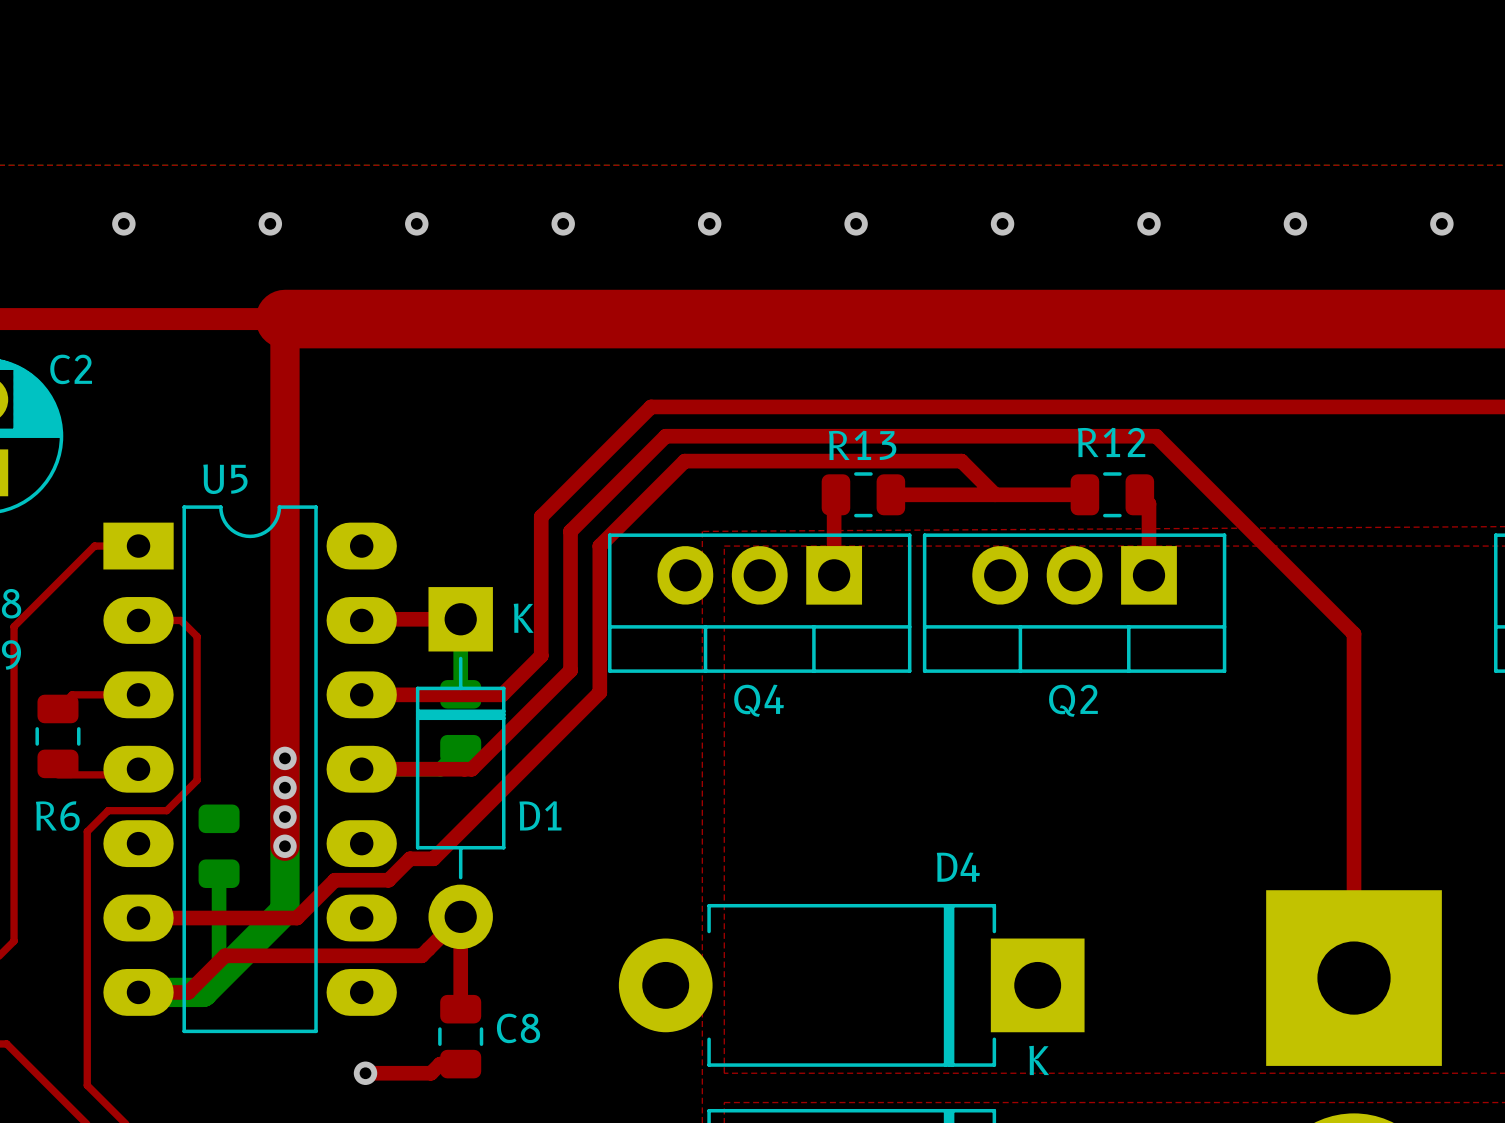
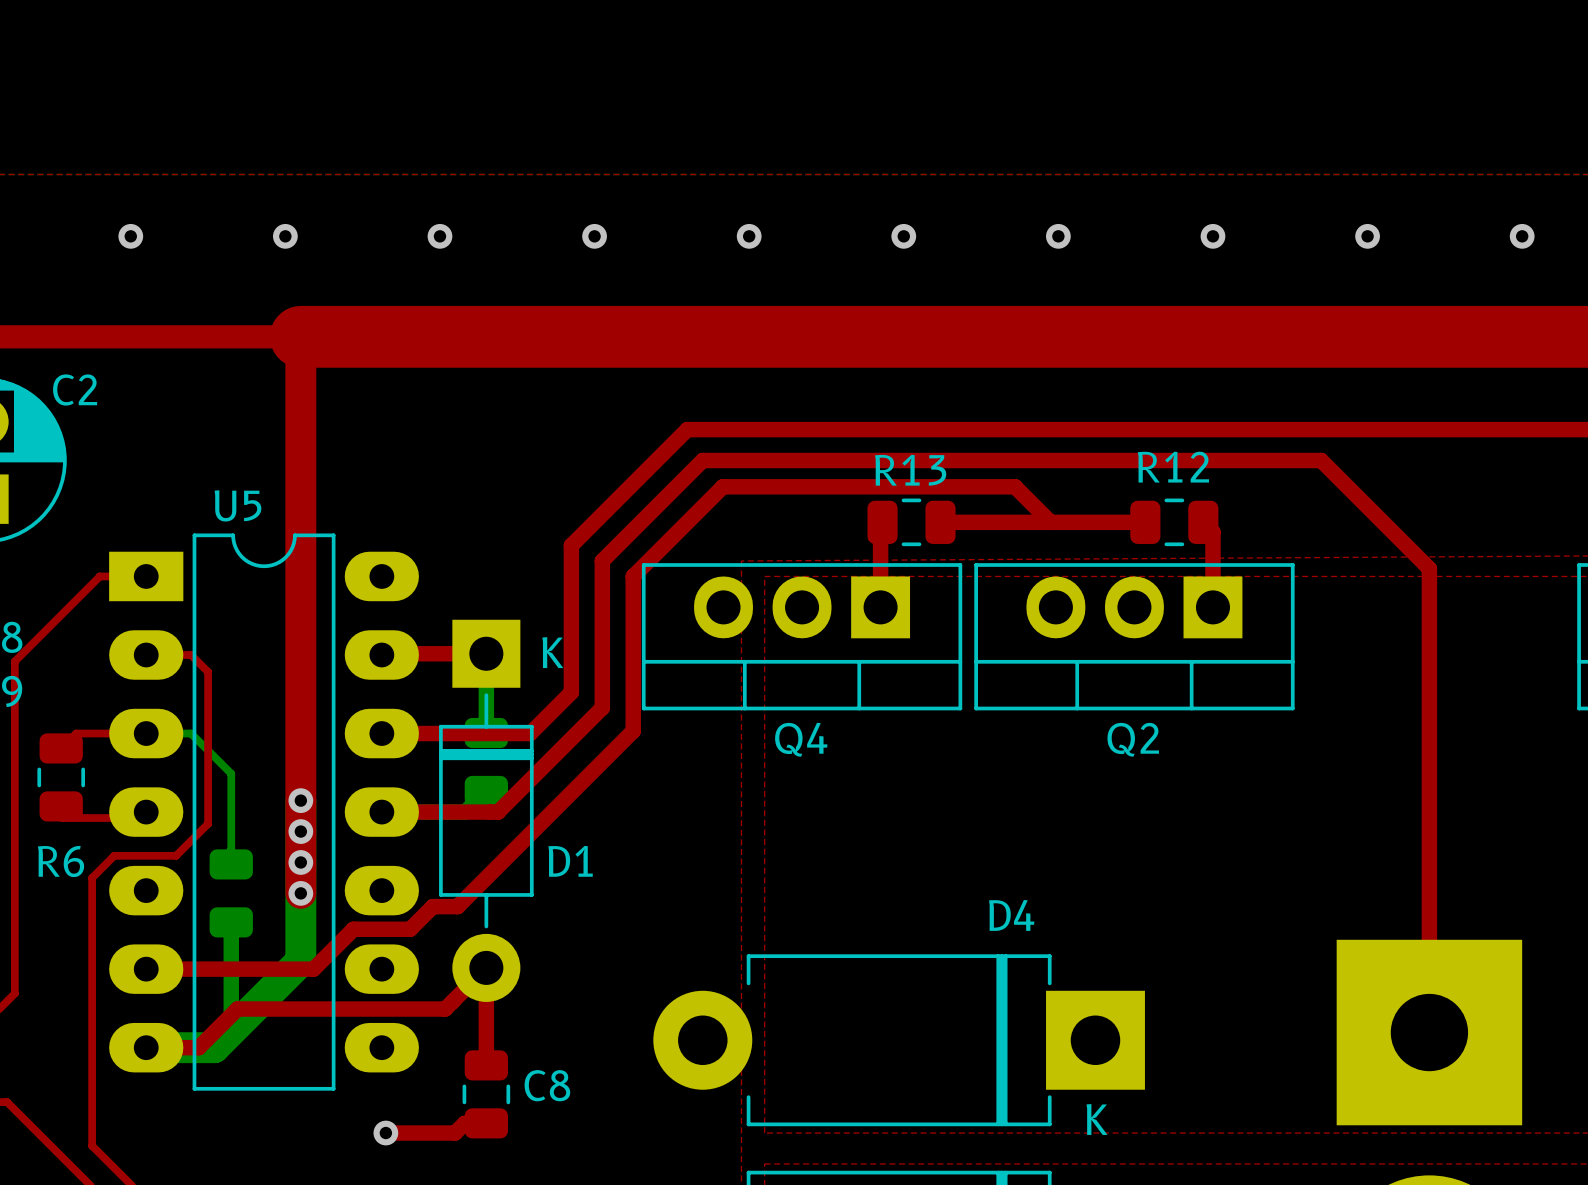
top track: (1156, 436) (1354, 633) -> (1220, 460) (1321, 460) (1429, 568) (1429, 669)
bottom track: none -> (146, 733) (191, 733) (231, 773) (231, 864)

